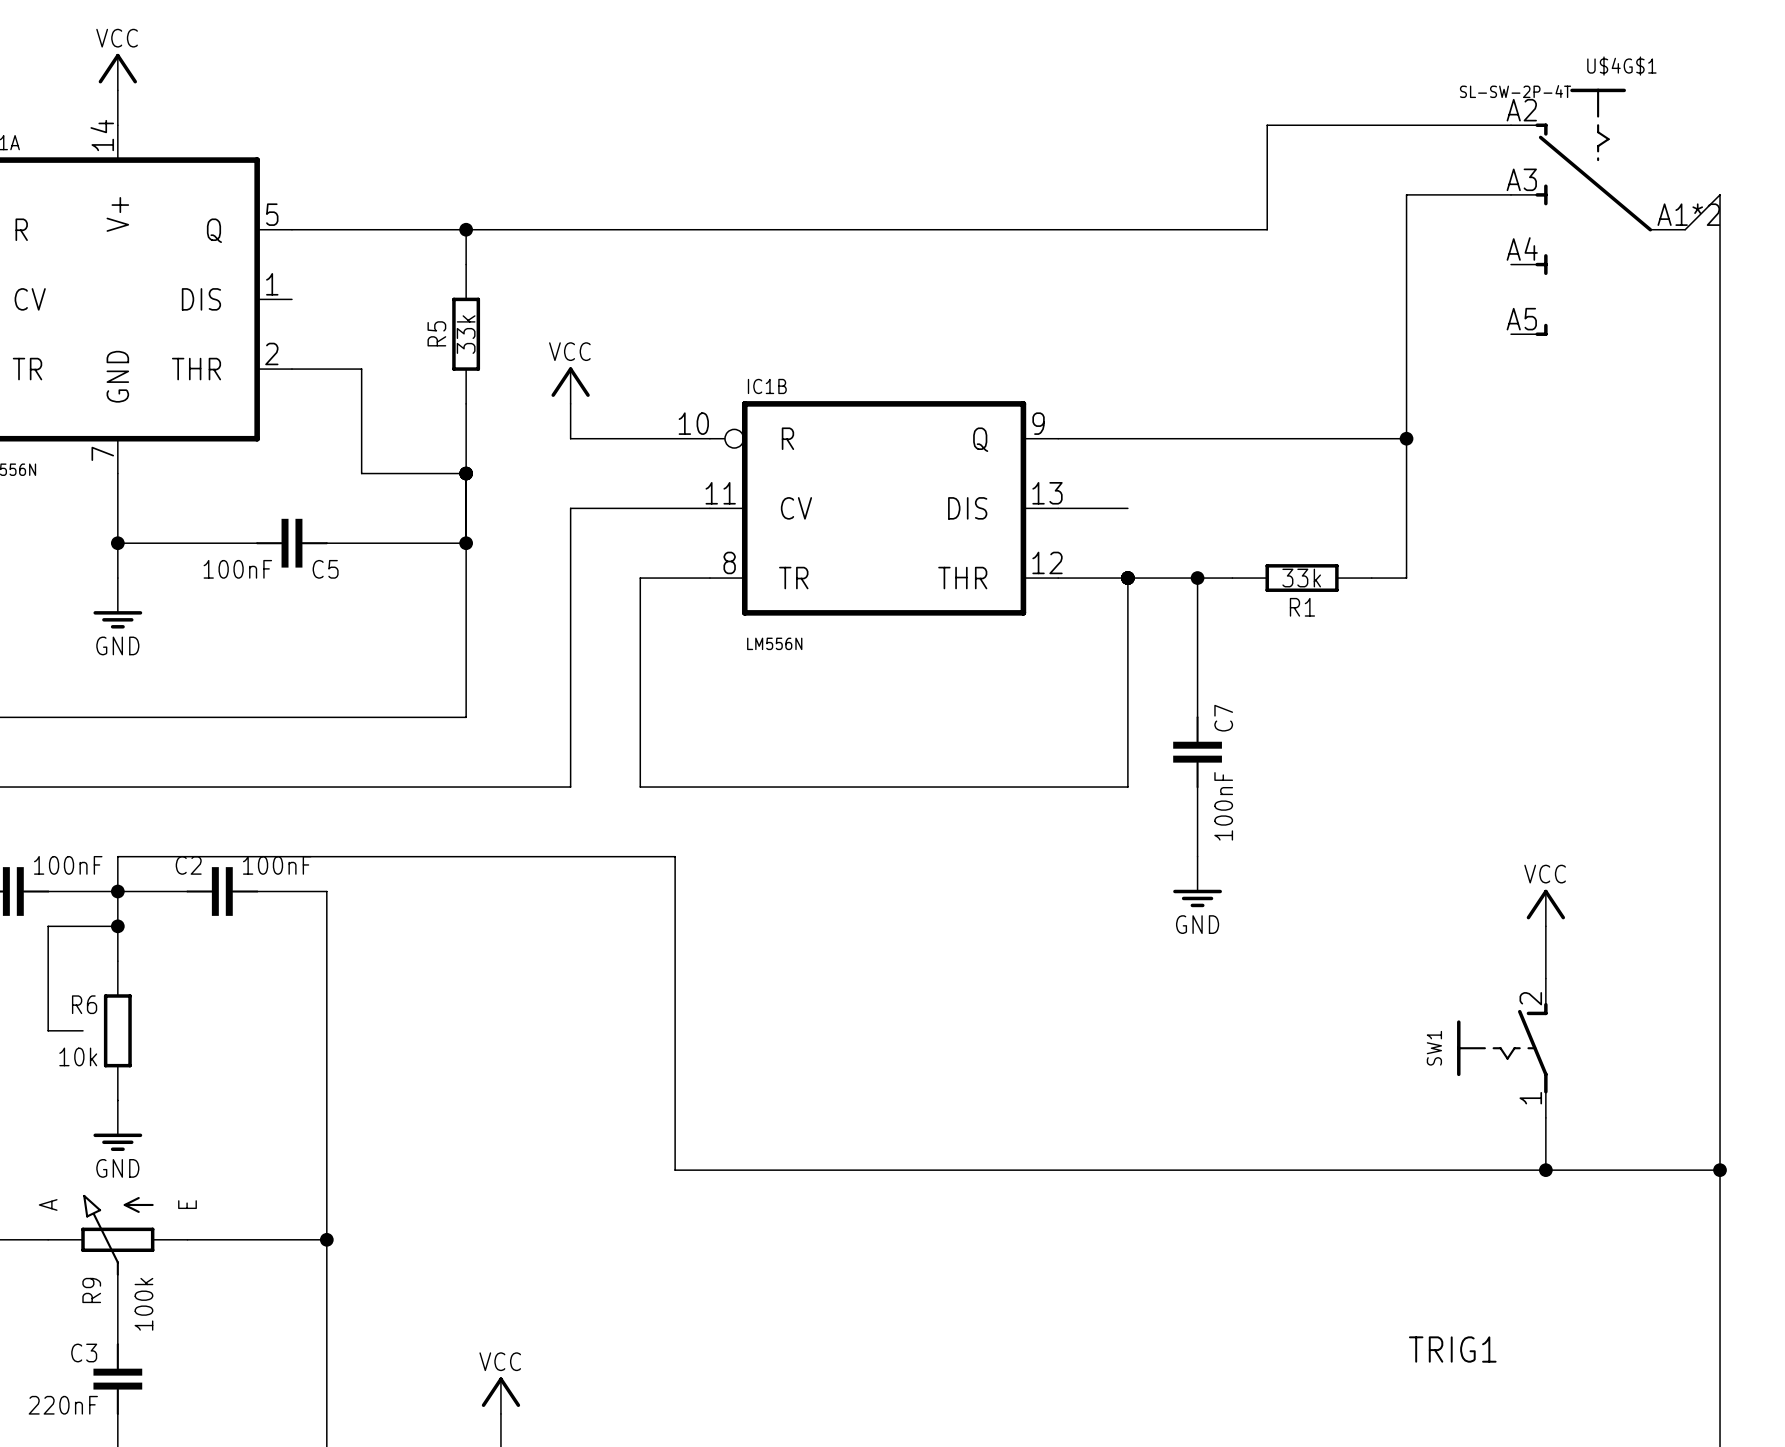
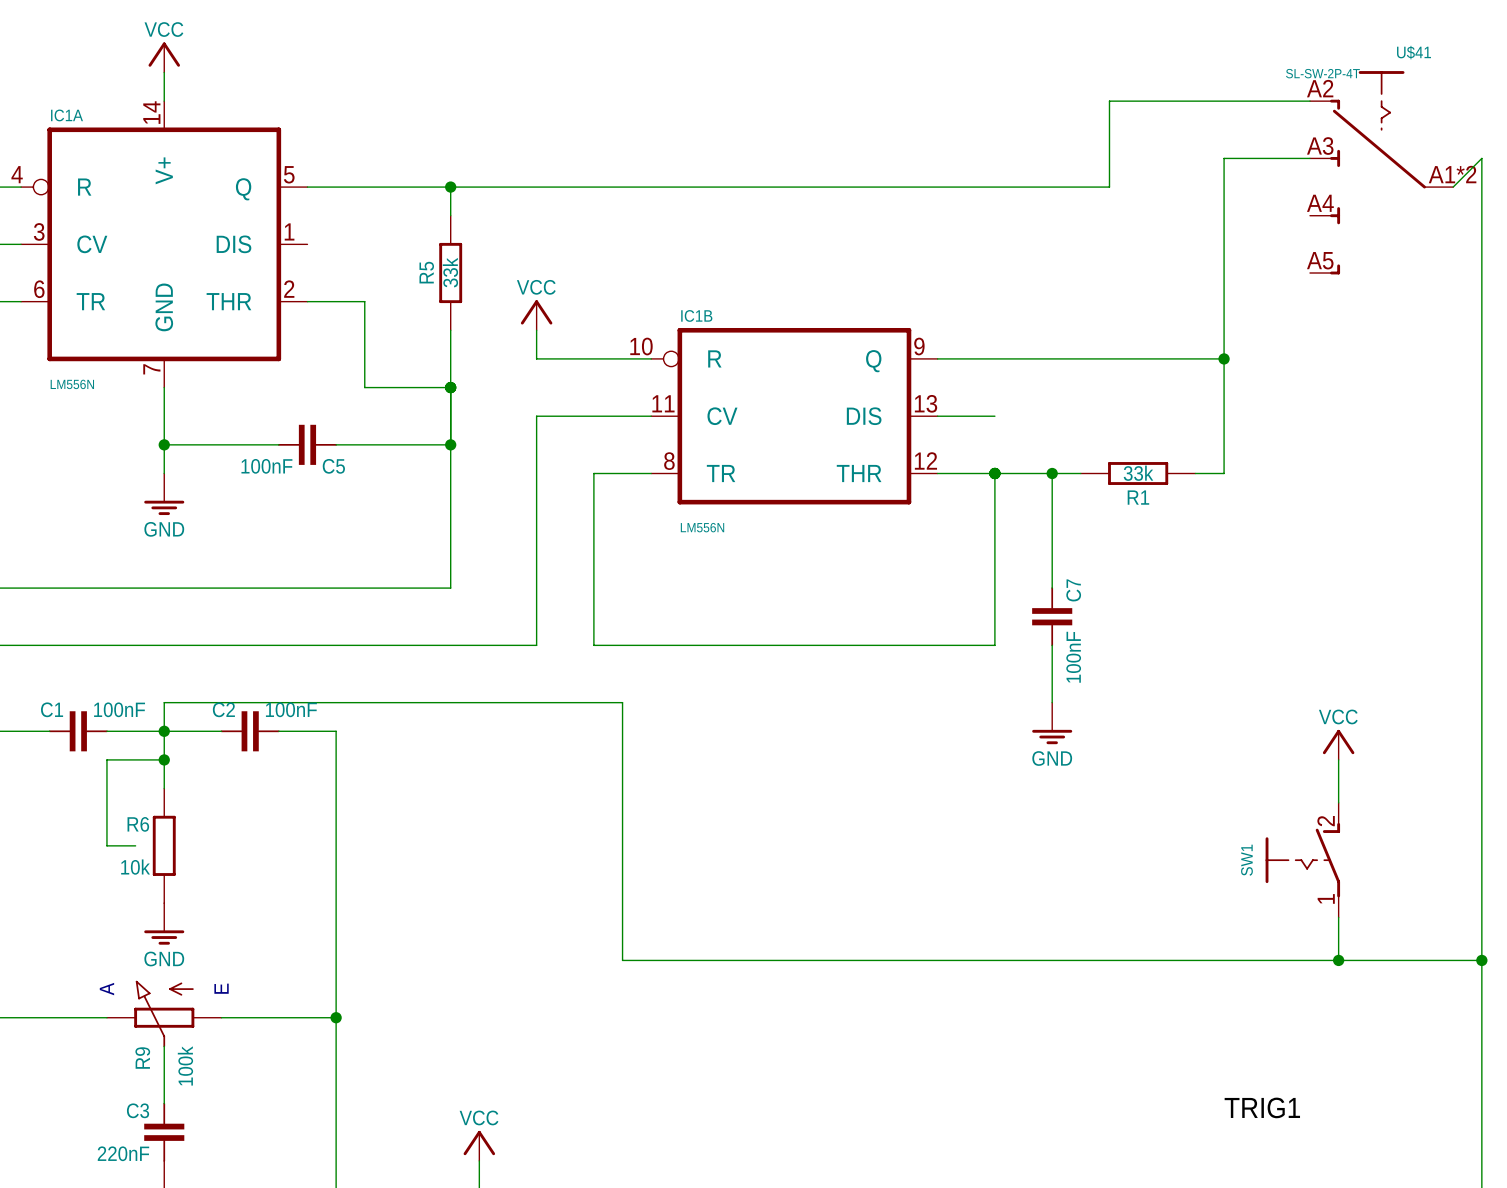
U$4G$1 name: U$4G$1 (1621, 66) -> U$41 (1414, 52)

